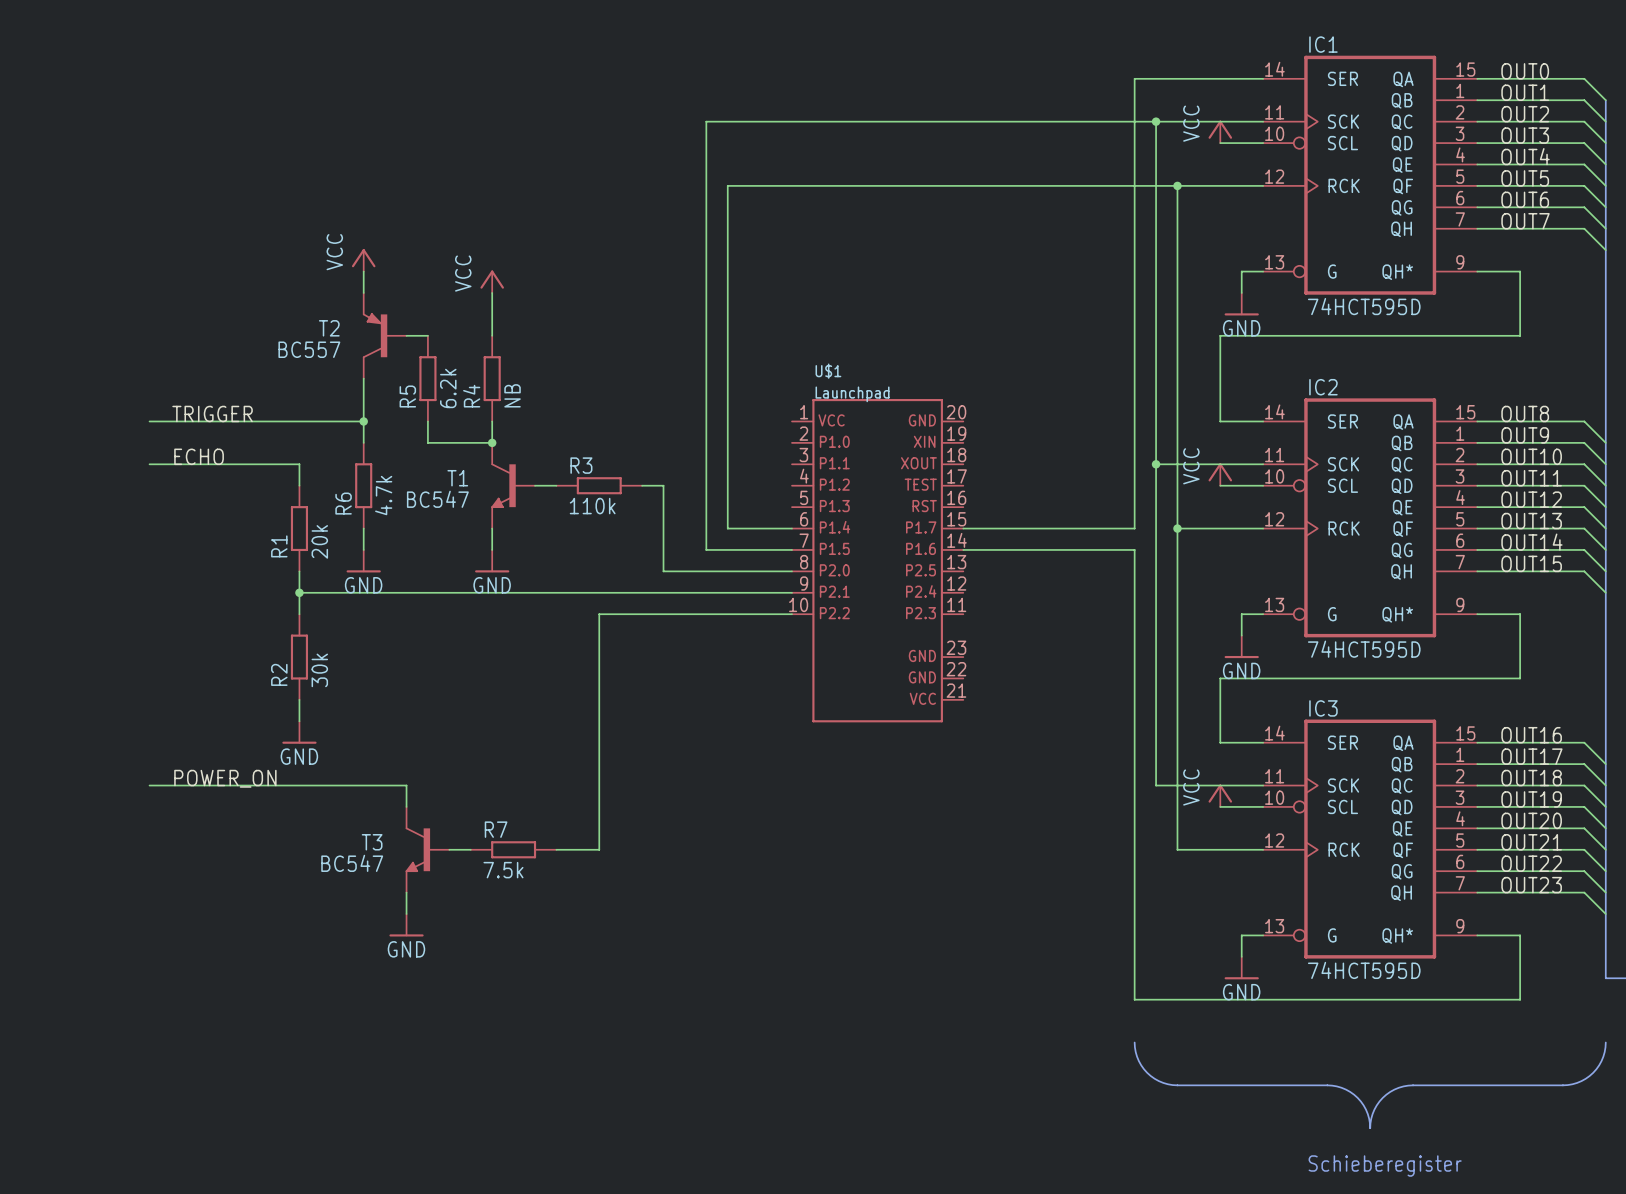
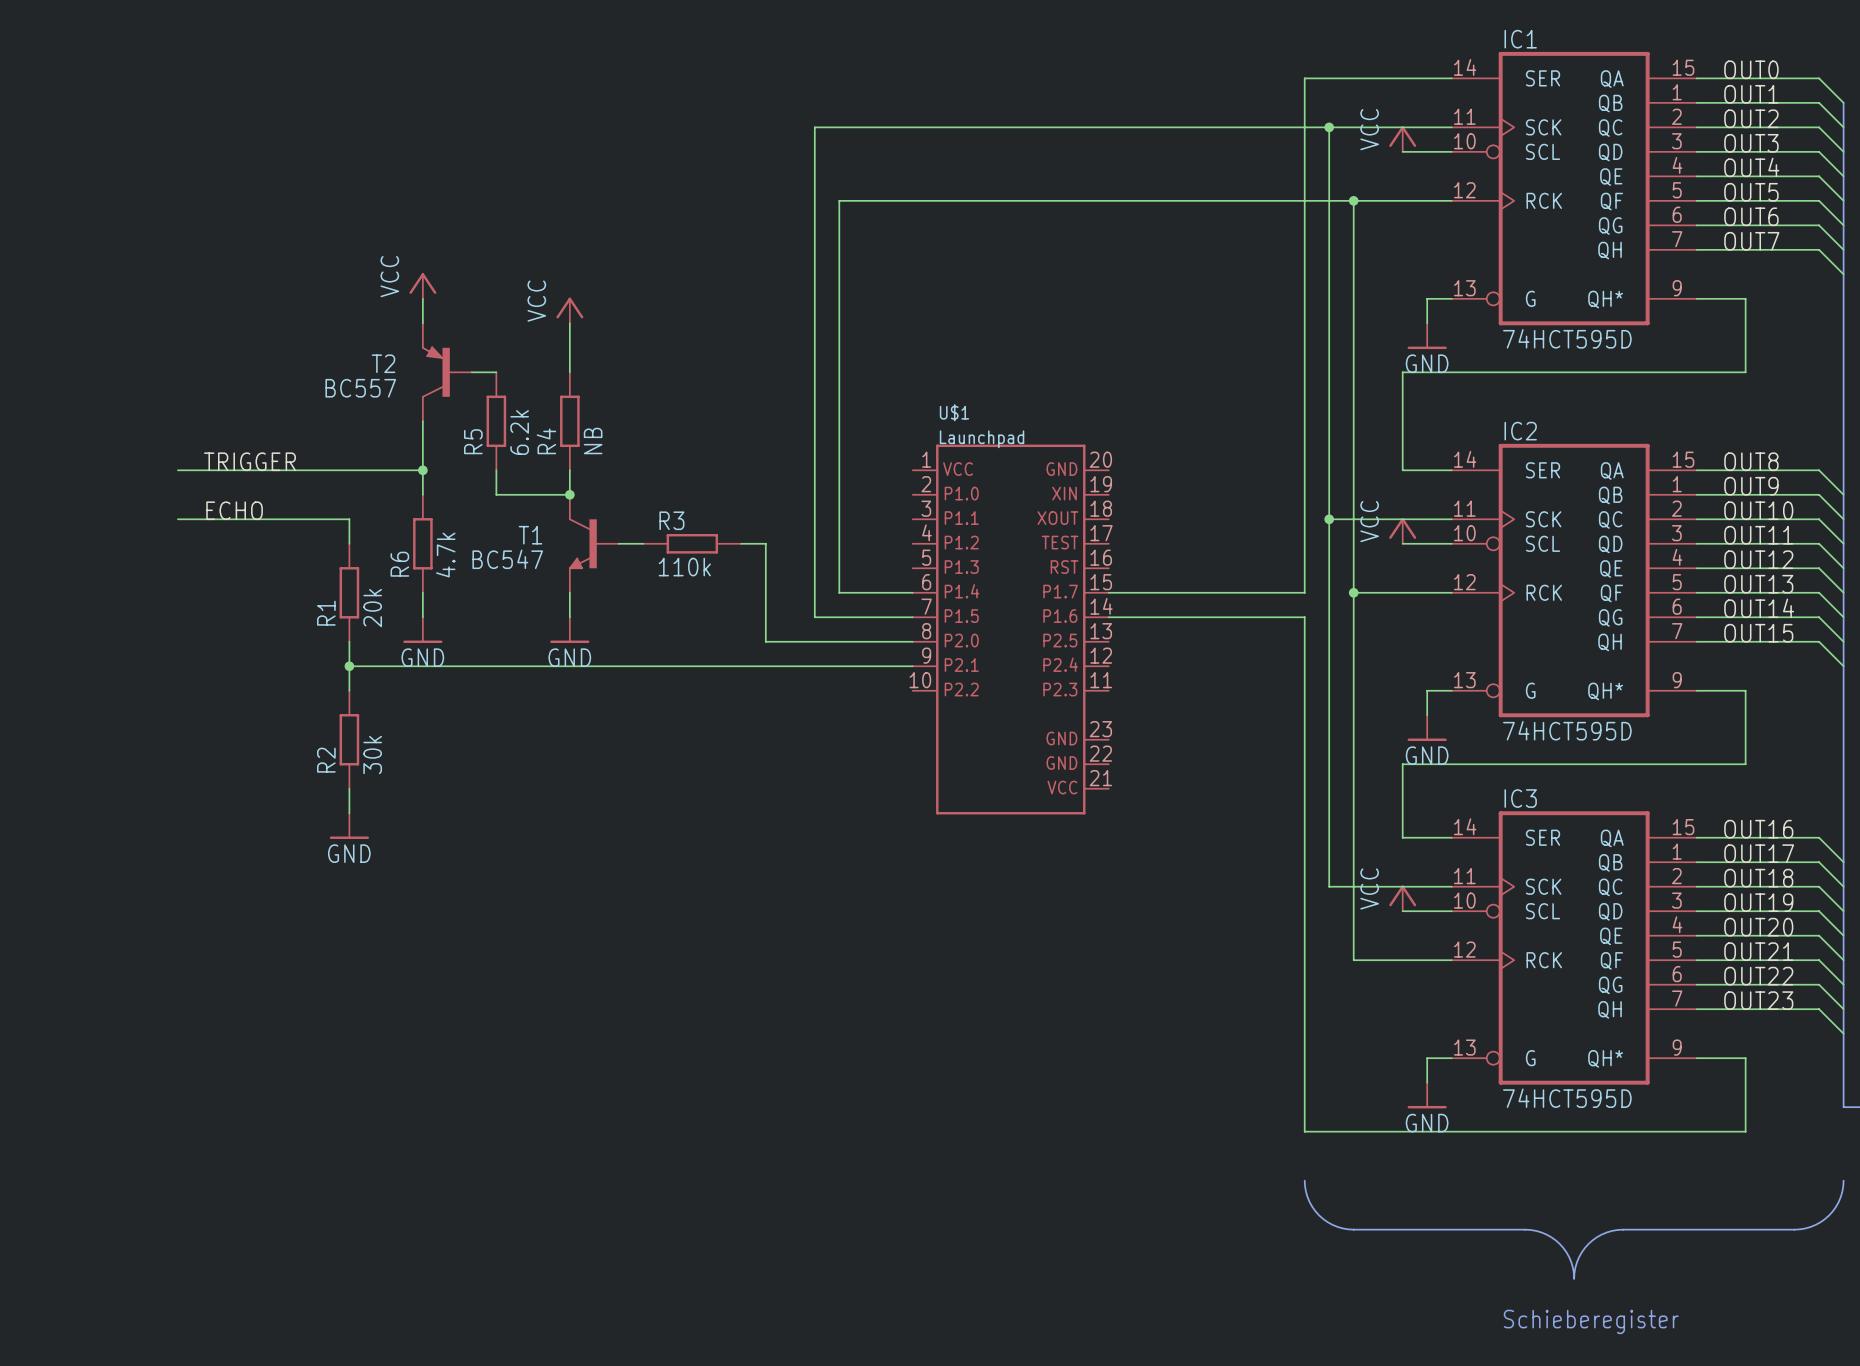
wire: (792, 614) (599, 614) (599, 849) (556, 849) -> none
label: POWER_ON (225, 778) -> none
wire: (149, 785) (406, 785) (406, 806) -> none
T3: BC547 (427, 849) -> none
wire: (449, 849) (470, 849) -> none
R7: 7.5k (513, 849) -> none
wire: (406, 892) (406, 914) -> none
power symbol: GND (406, 925) -> none

